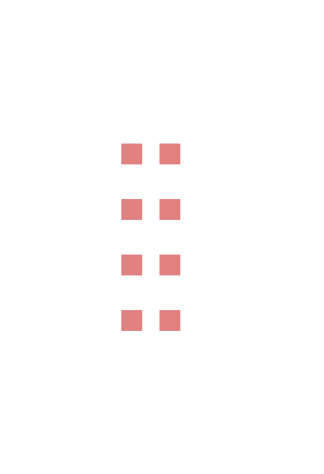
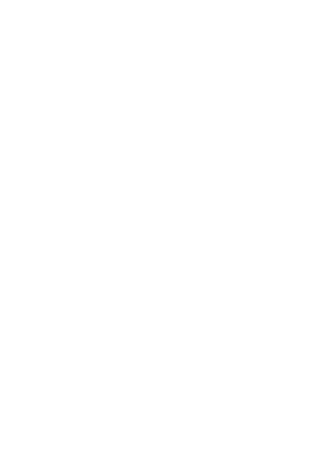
part: (150, 153) -> none
part: (150, 209) -> none
part: (150, 264) -> none
part: (150, 320) -> none

